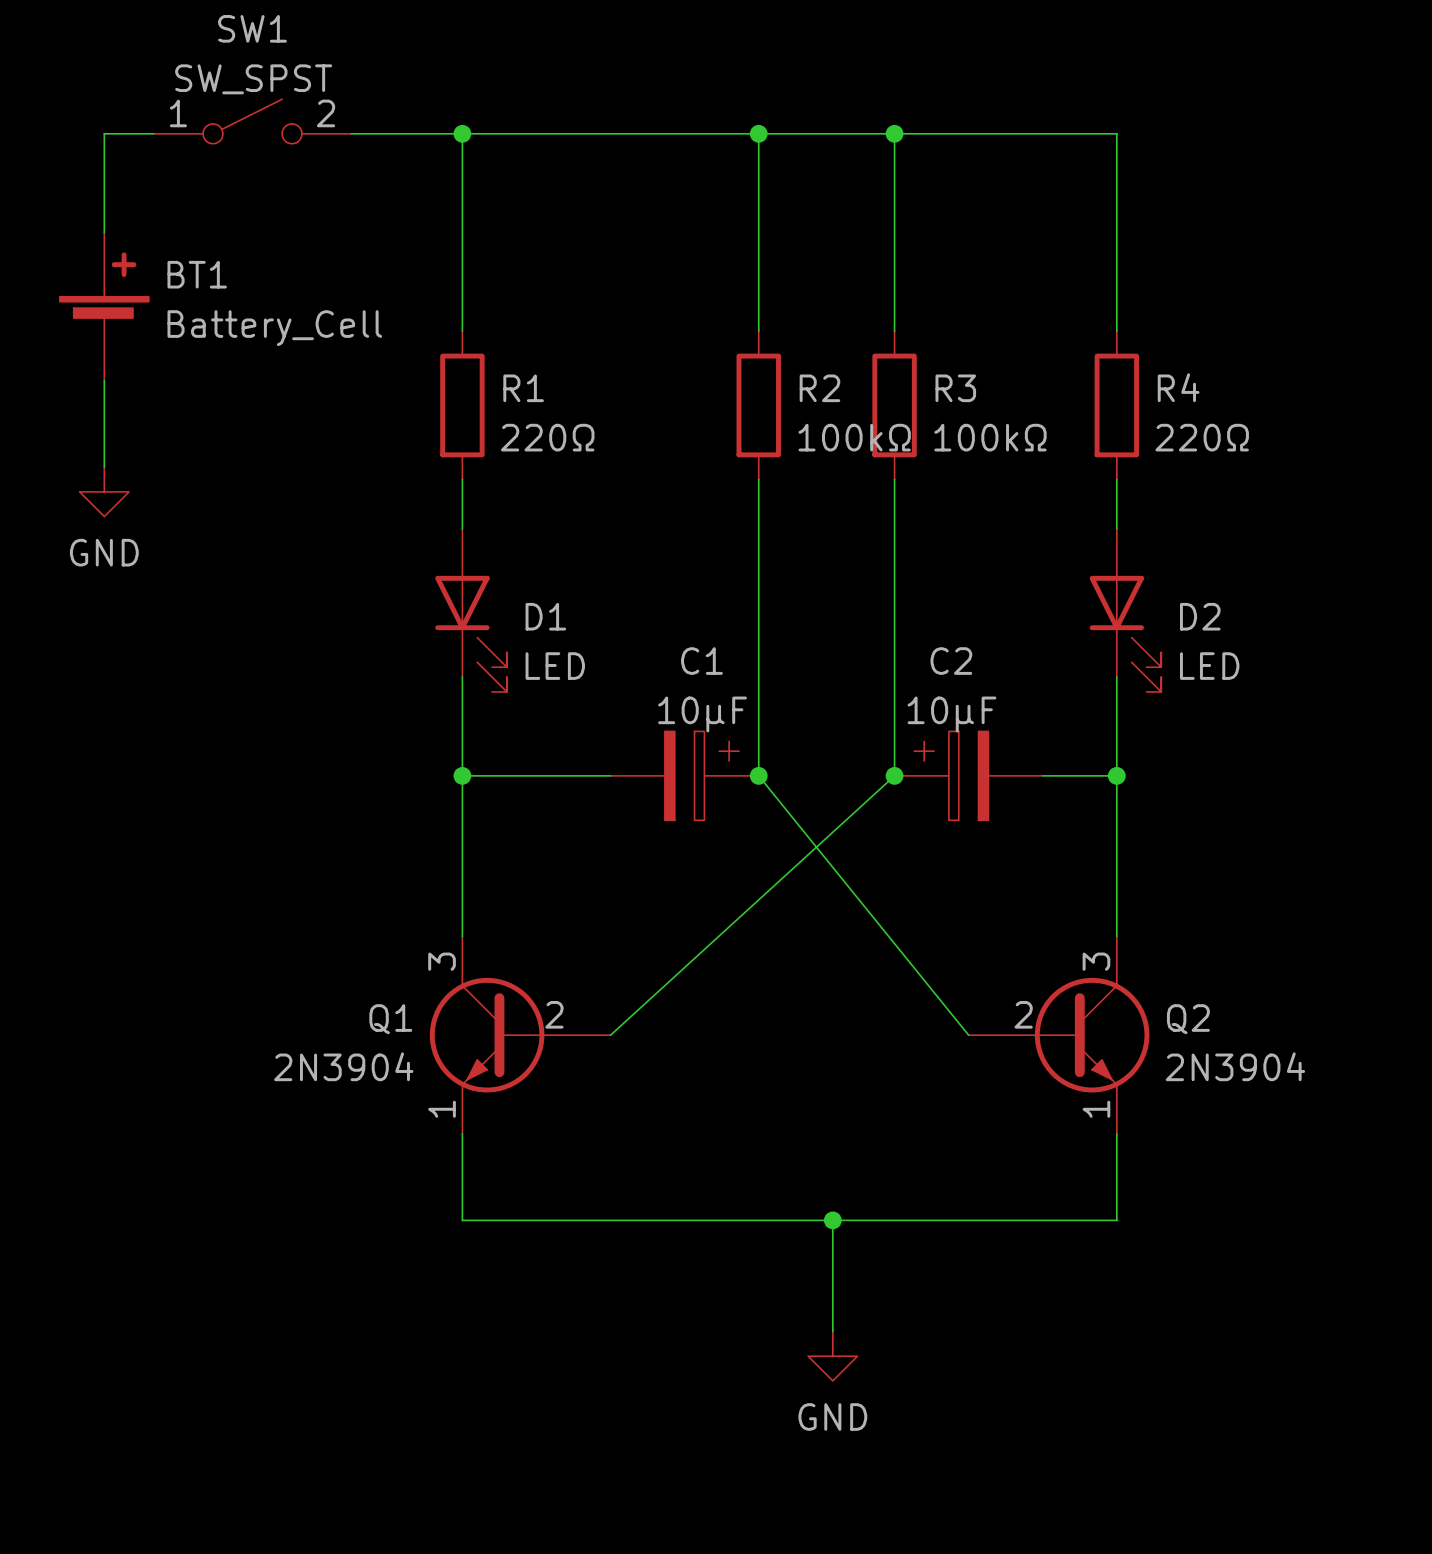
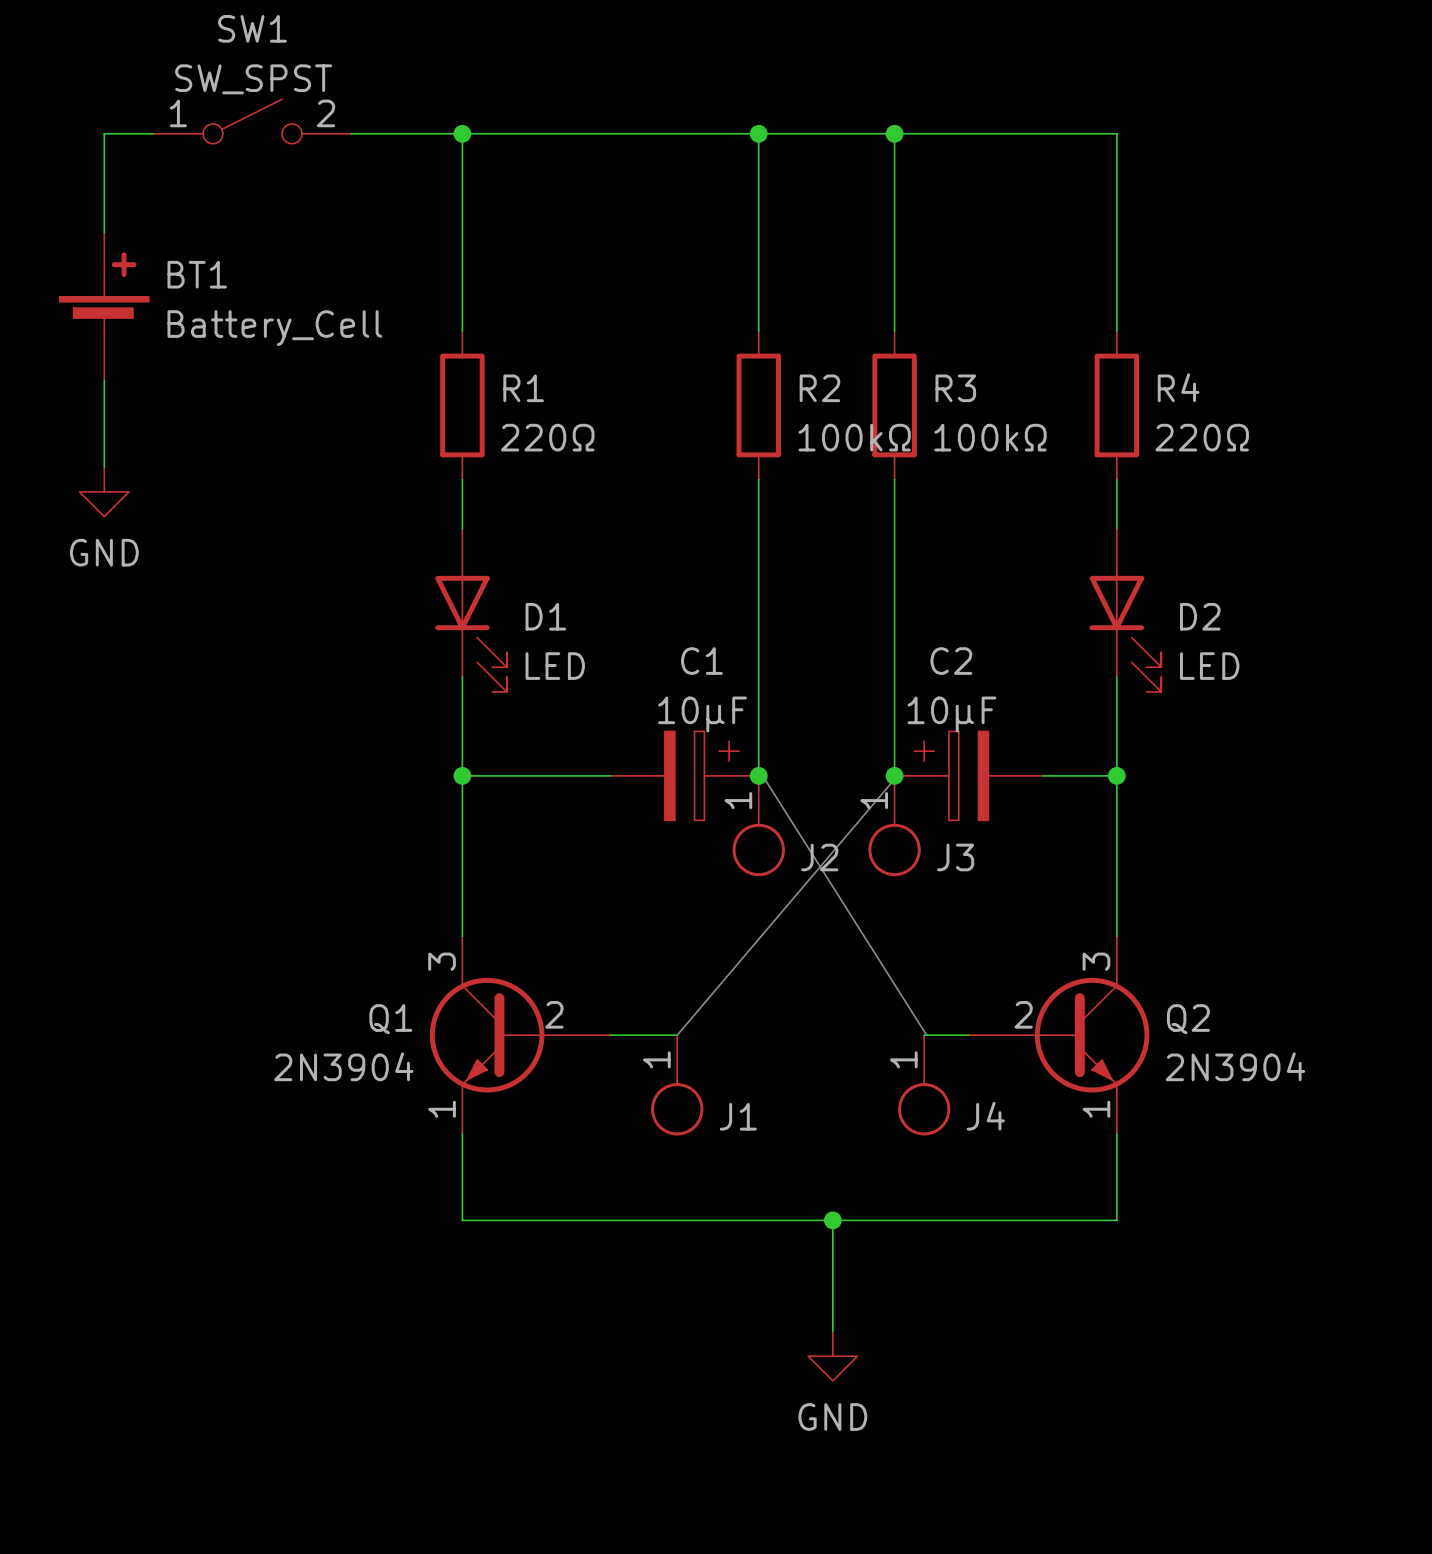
line: none -> (761, 773) (926, 1035)
line: none -> (899, 773) (677, 1035)
wire: (758, 775) (968, 1035) -> (924, 1035) (968, 1035)
wire: (894, 775) (610, 1035) -> (677, 1035) (610, 1035)
J2: none -> (758, 826)
J3: none -> (894, 826)
J1: none -> (677, 1085)
J4: none -> (924, 1085)

